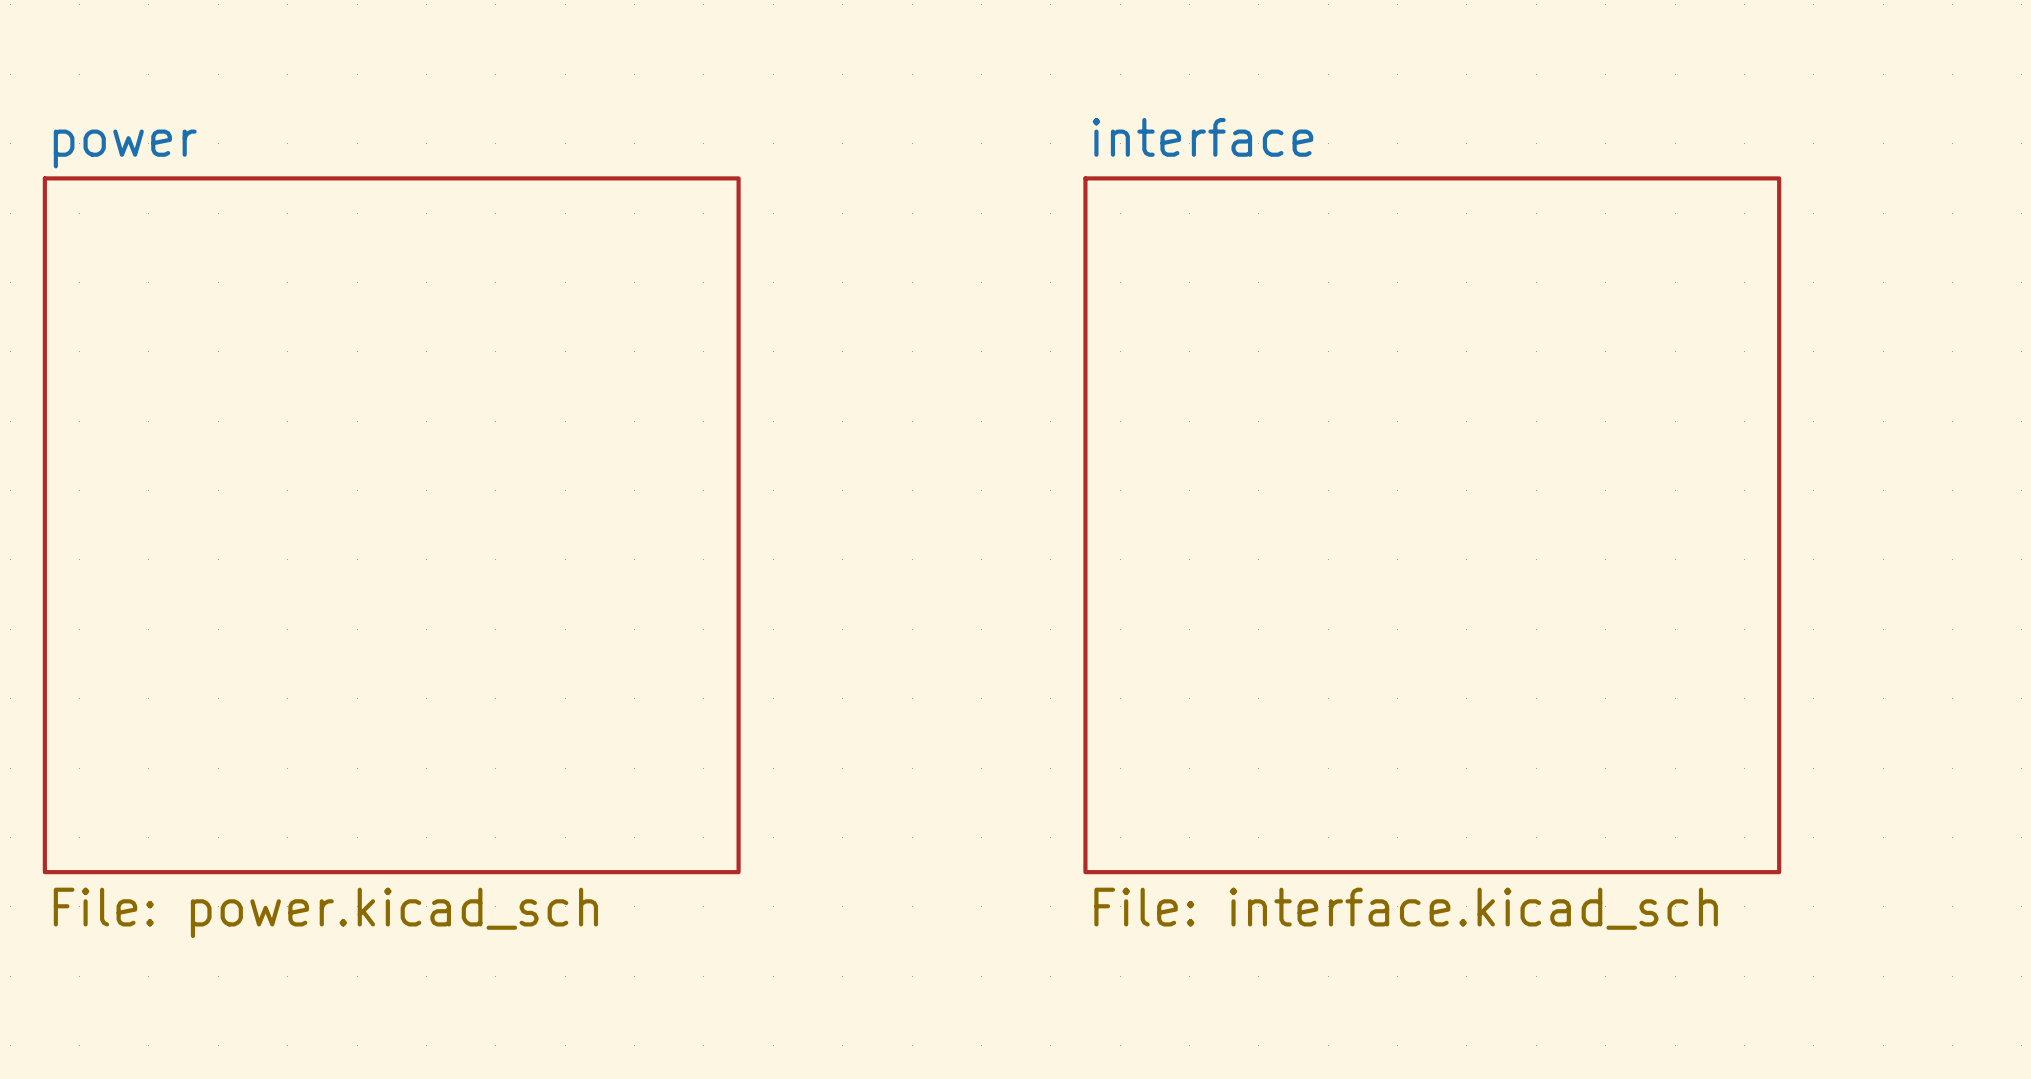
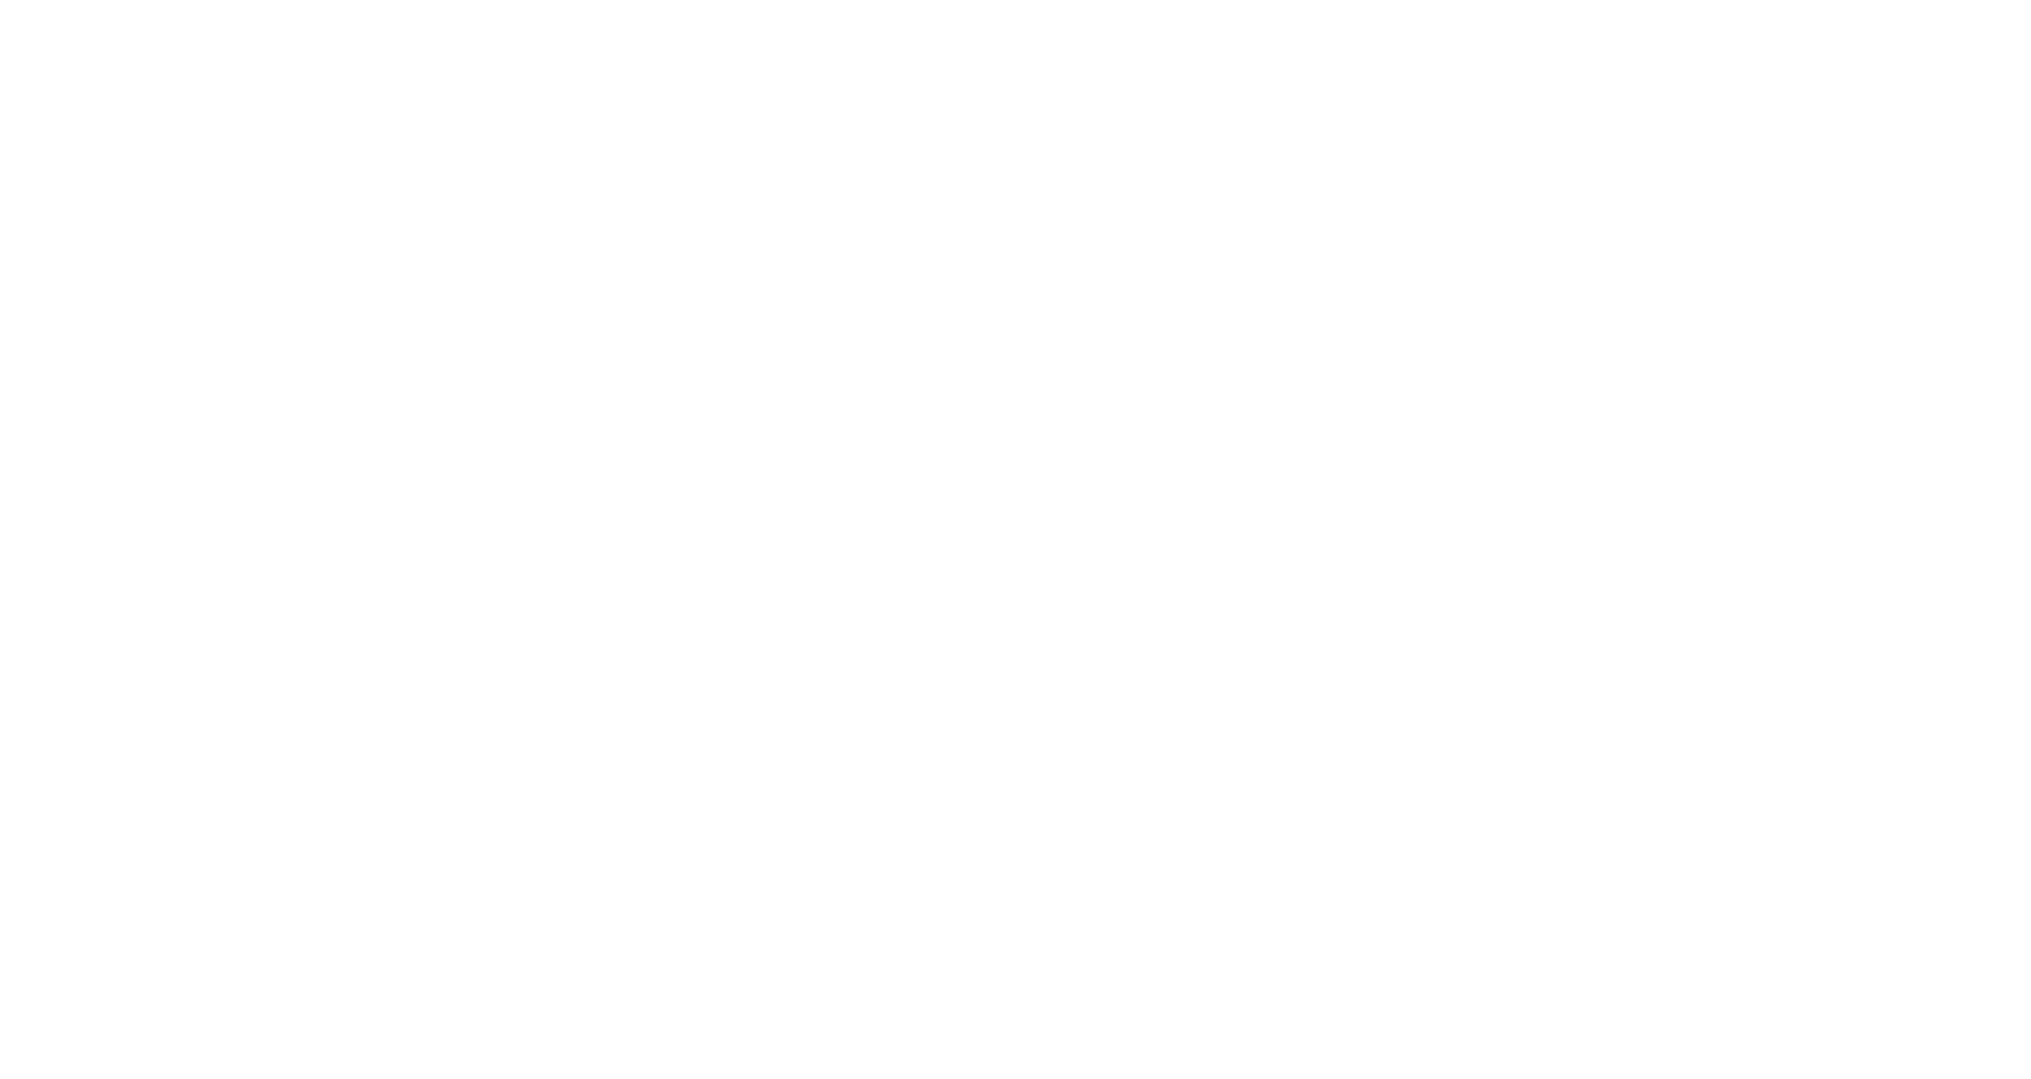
sheet power: File: power.kicad_sch (391, 525) -> none
sheet interface: File: interface.kicad_sch (1432, 525) -> none

